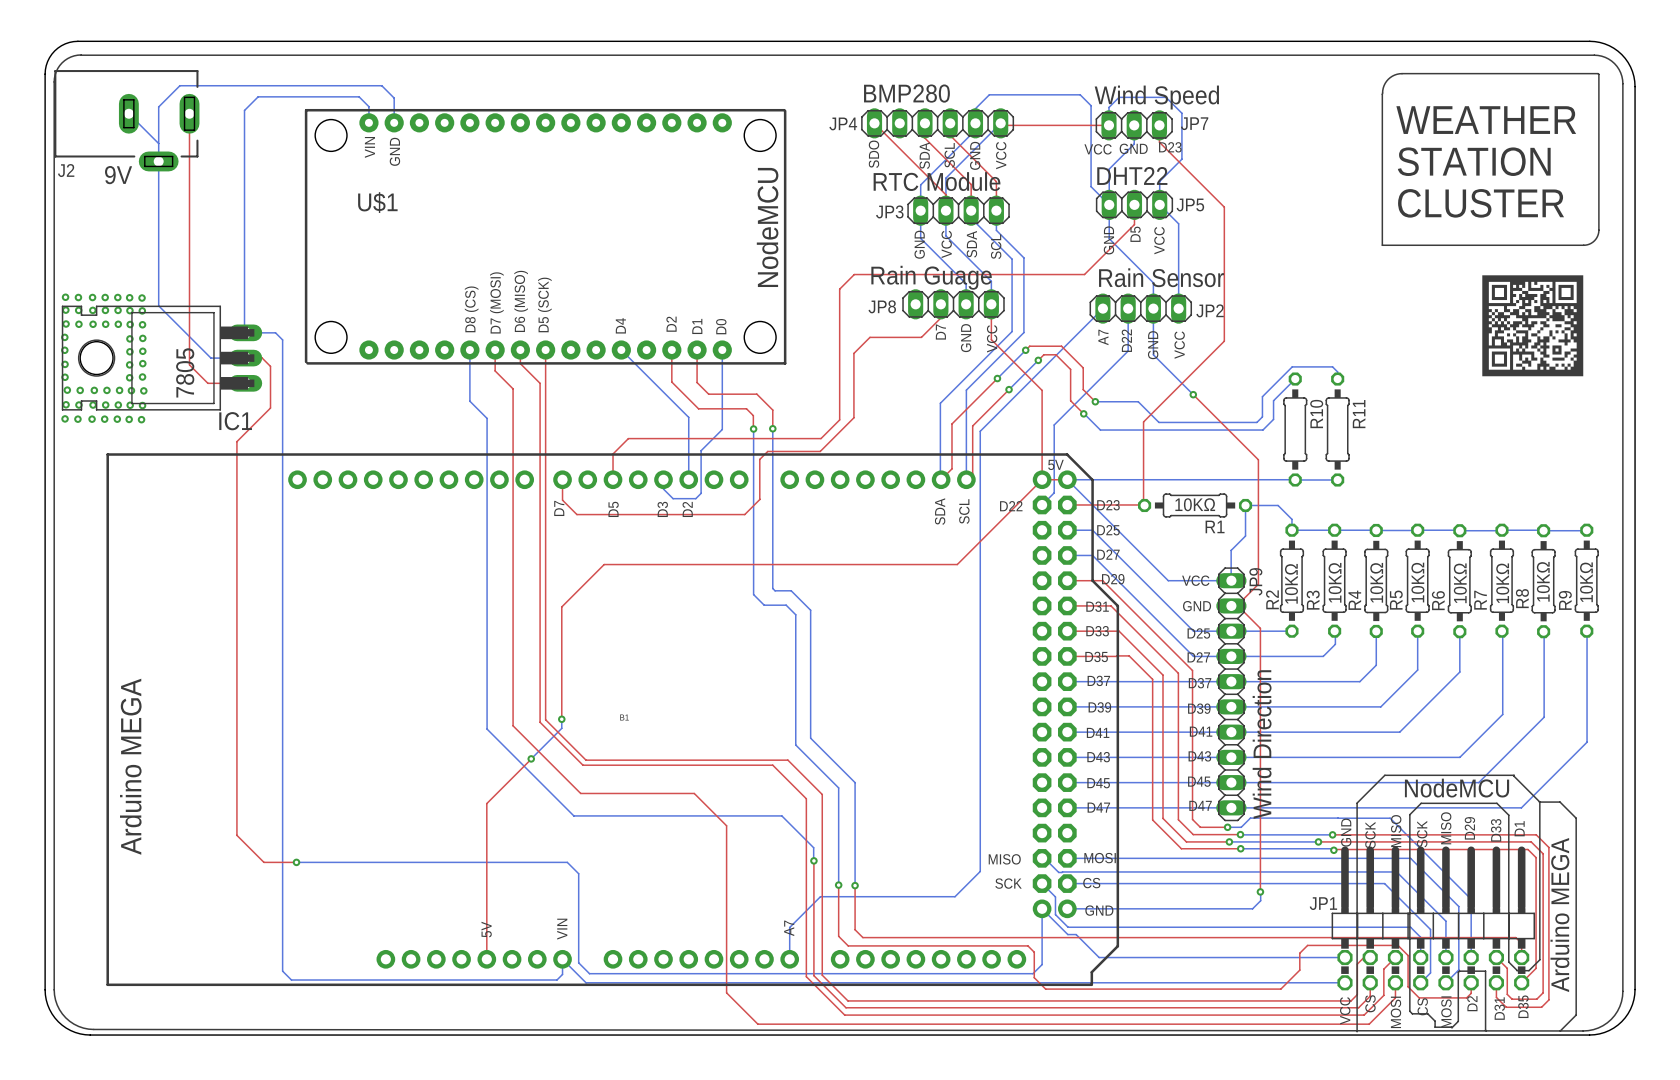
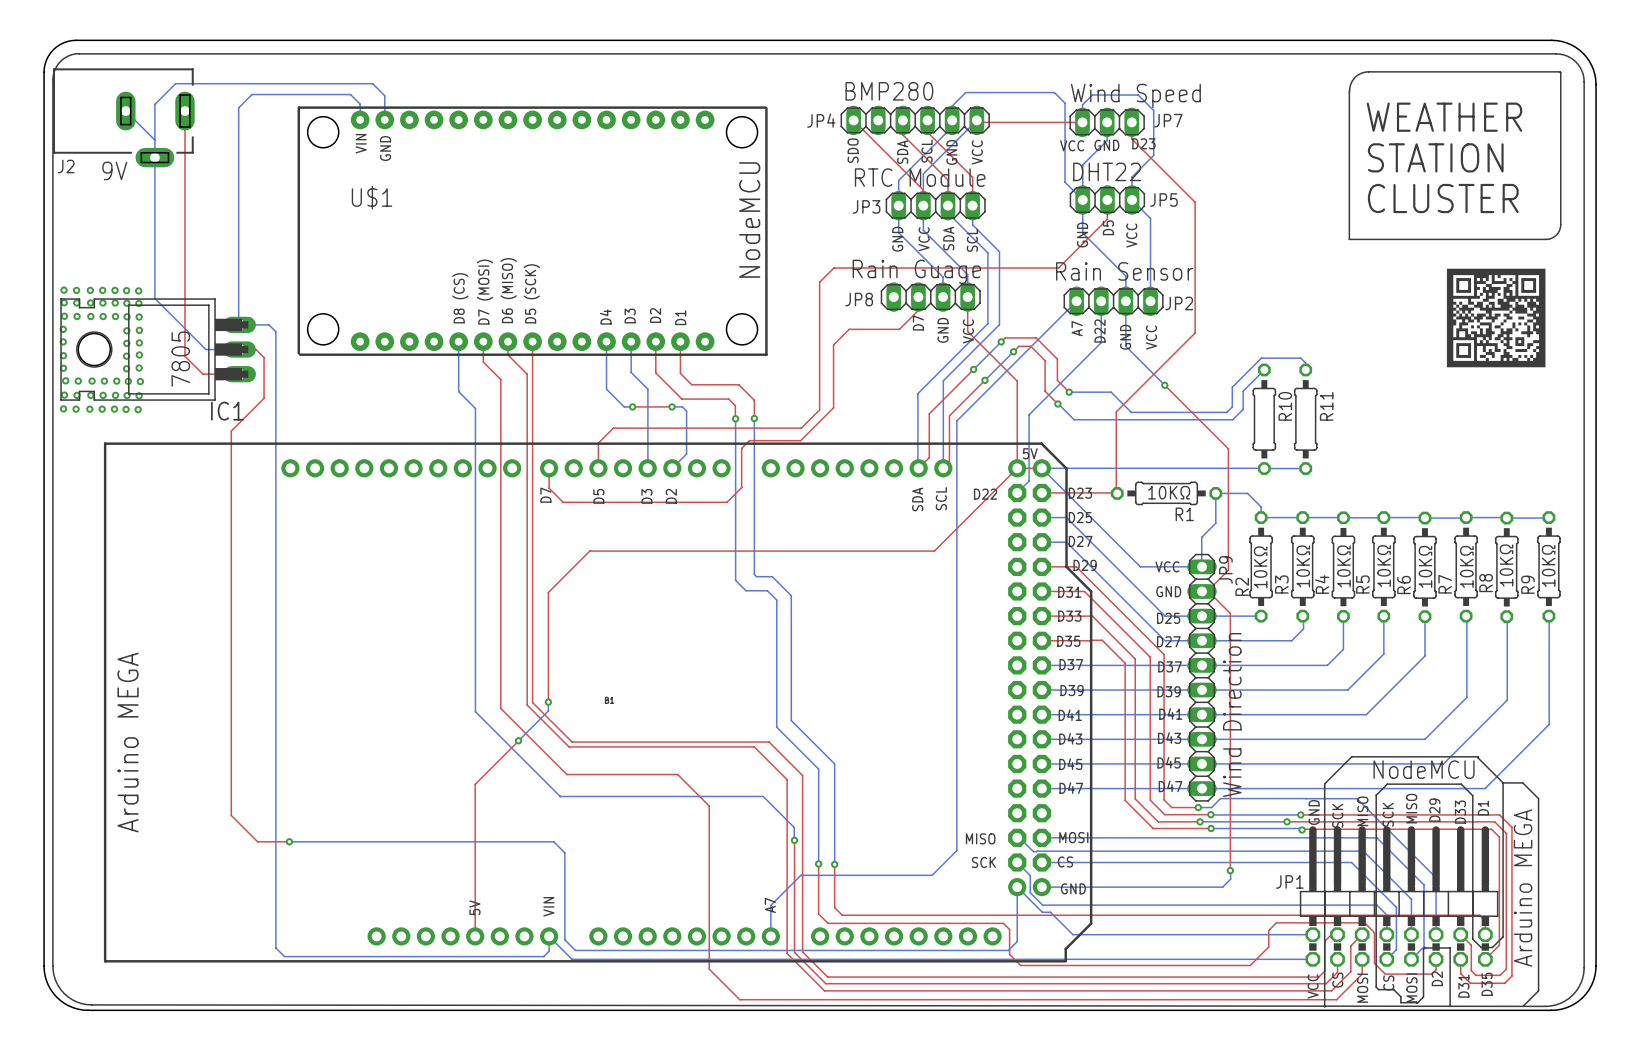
text: none -> D3 (630, 316)
text: D0 (721, 326) -> none
bottom track: (621, 350) (688, 417) (688, 479) -> (606, 341) (606, 389) (624, 406) (632, 406)
bottom track: (722, 350) (722, 429) (701, 450) (701, 493) (695, 498) (673, 498) (663, 489) (663, 479) -> (631, 341) (631, 372) (647, 389) (647, 468)
top track: none -> (632, 406) (672, 406)
via: none -> (632, 406)
bottom track: none -> (672, 406) (682, 406) (686, 411) (686, 454) (672, 468)
via: none -> (672, 406)

